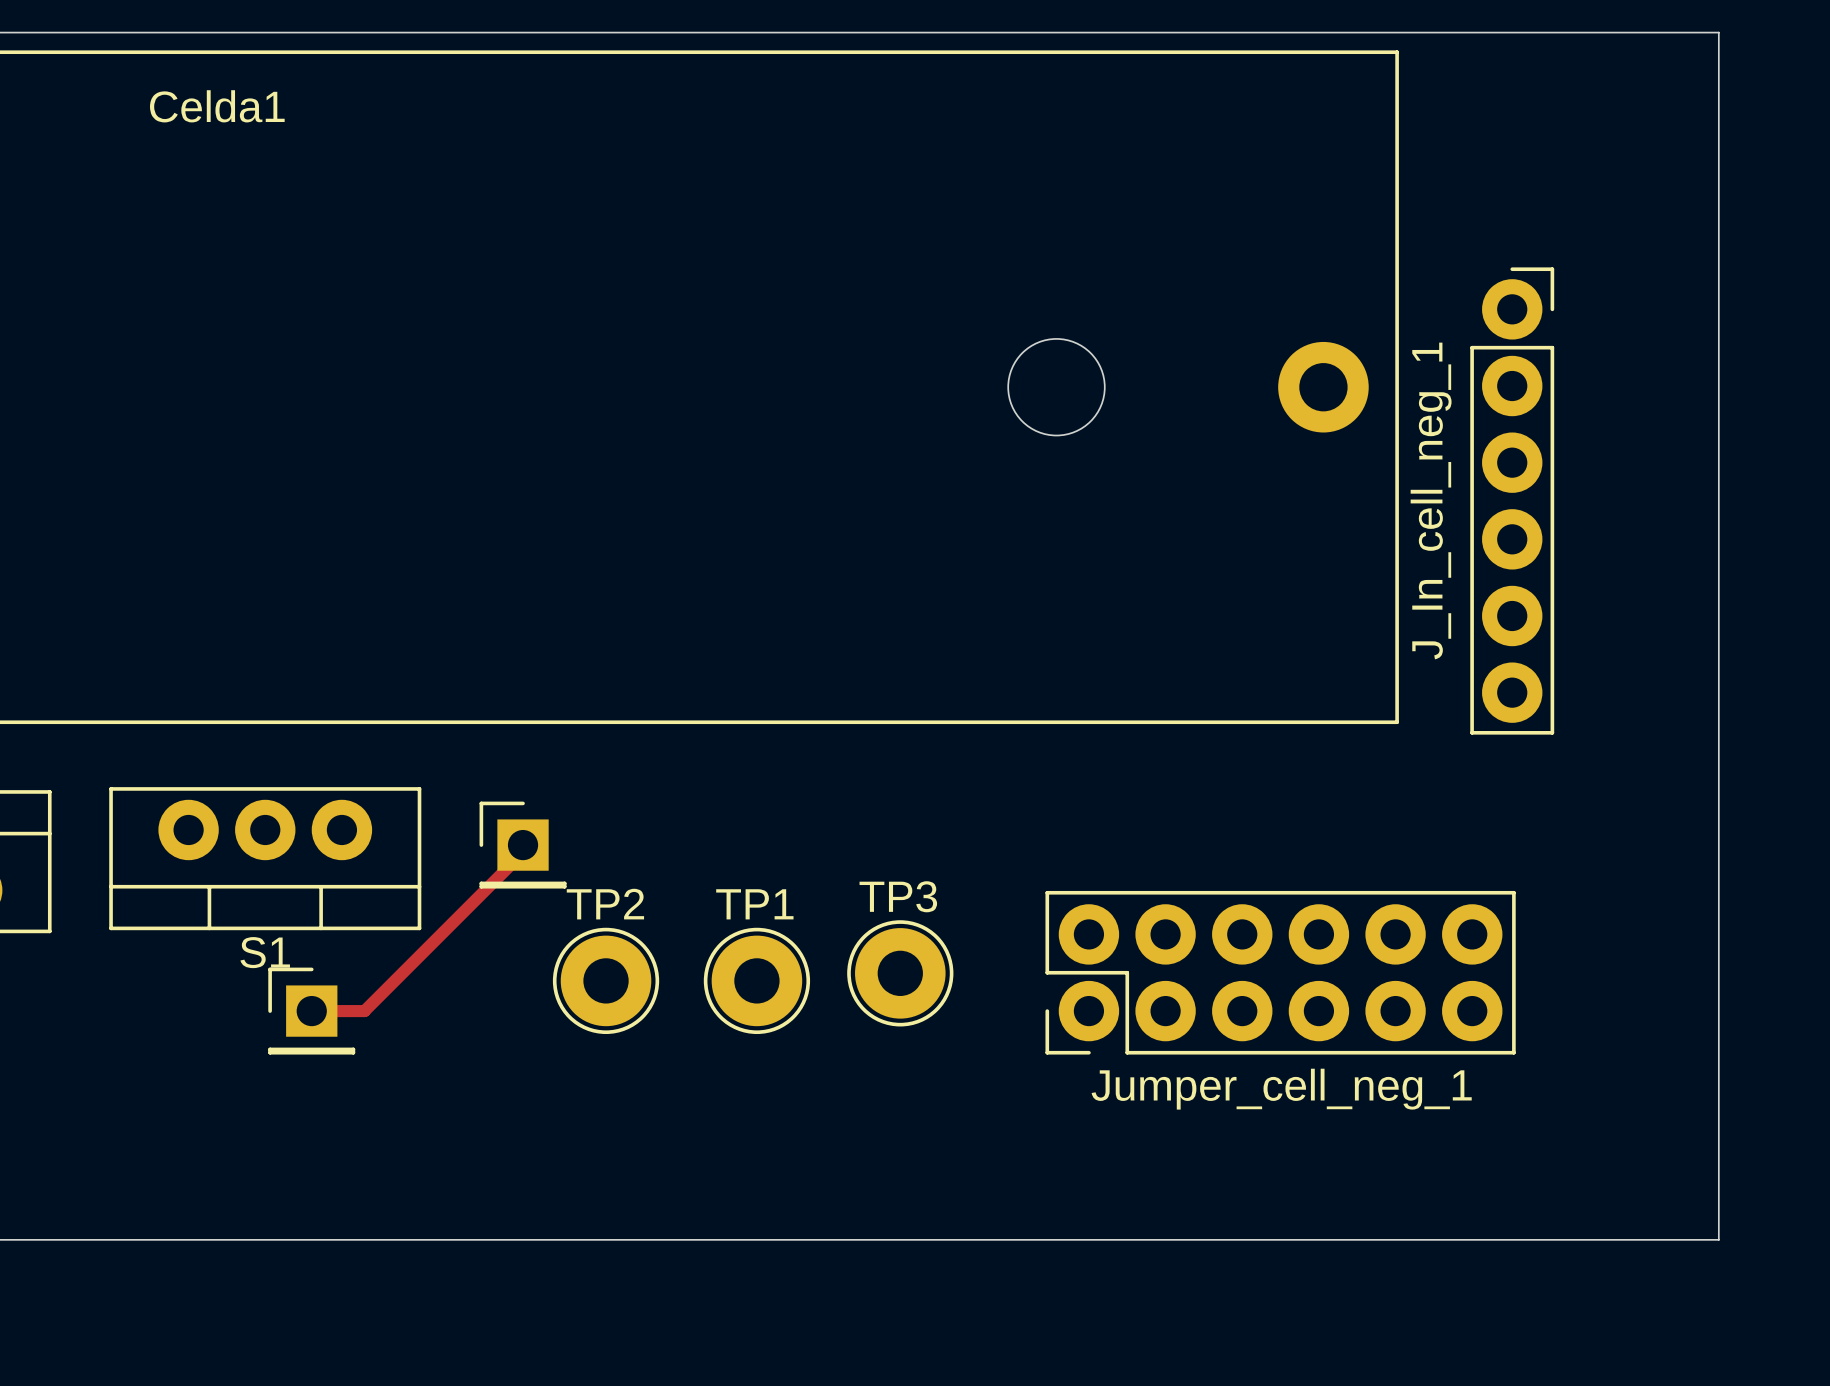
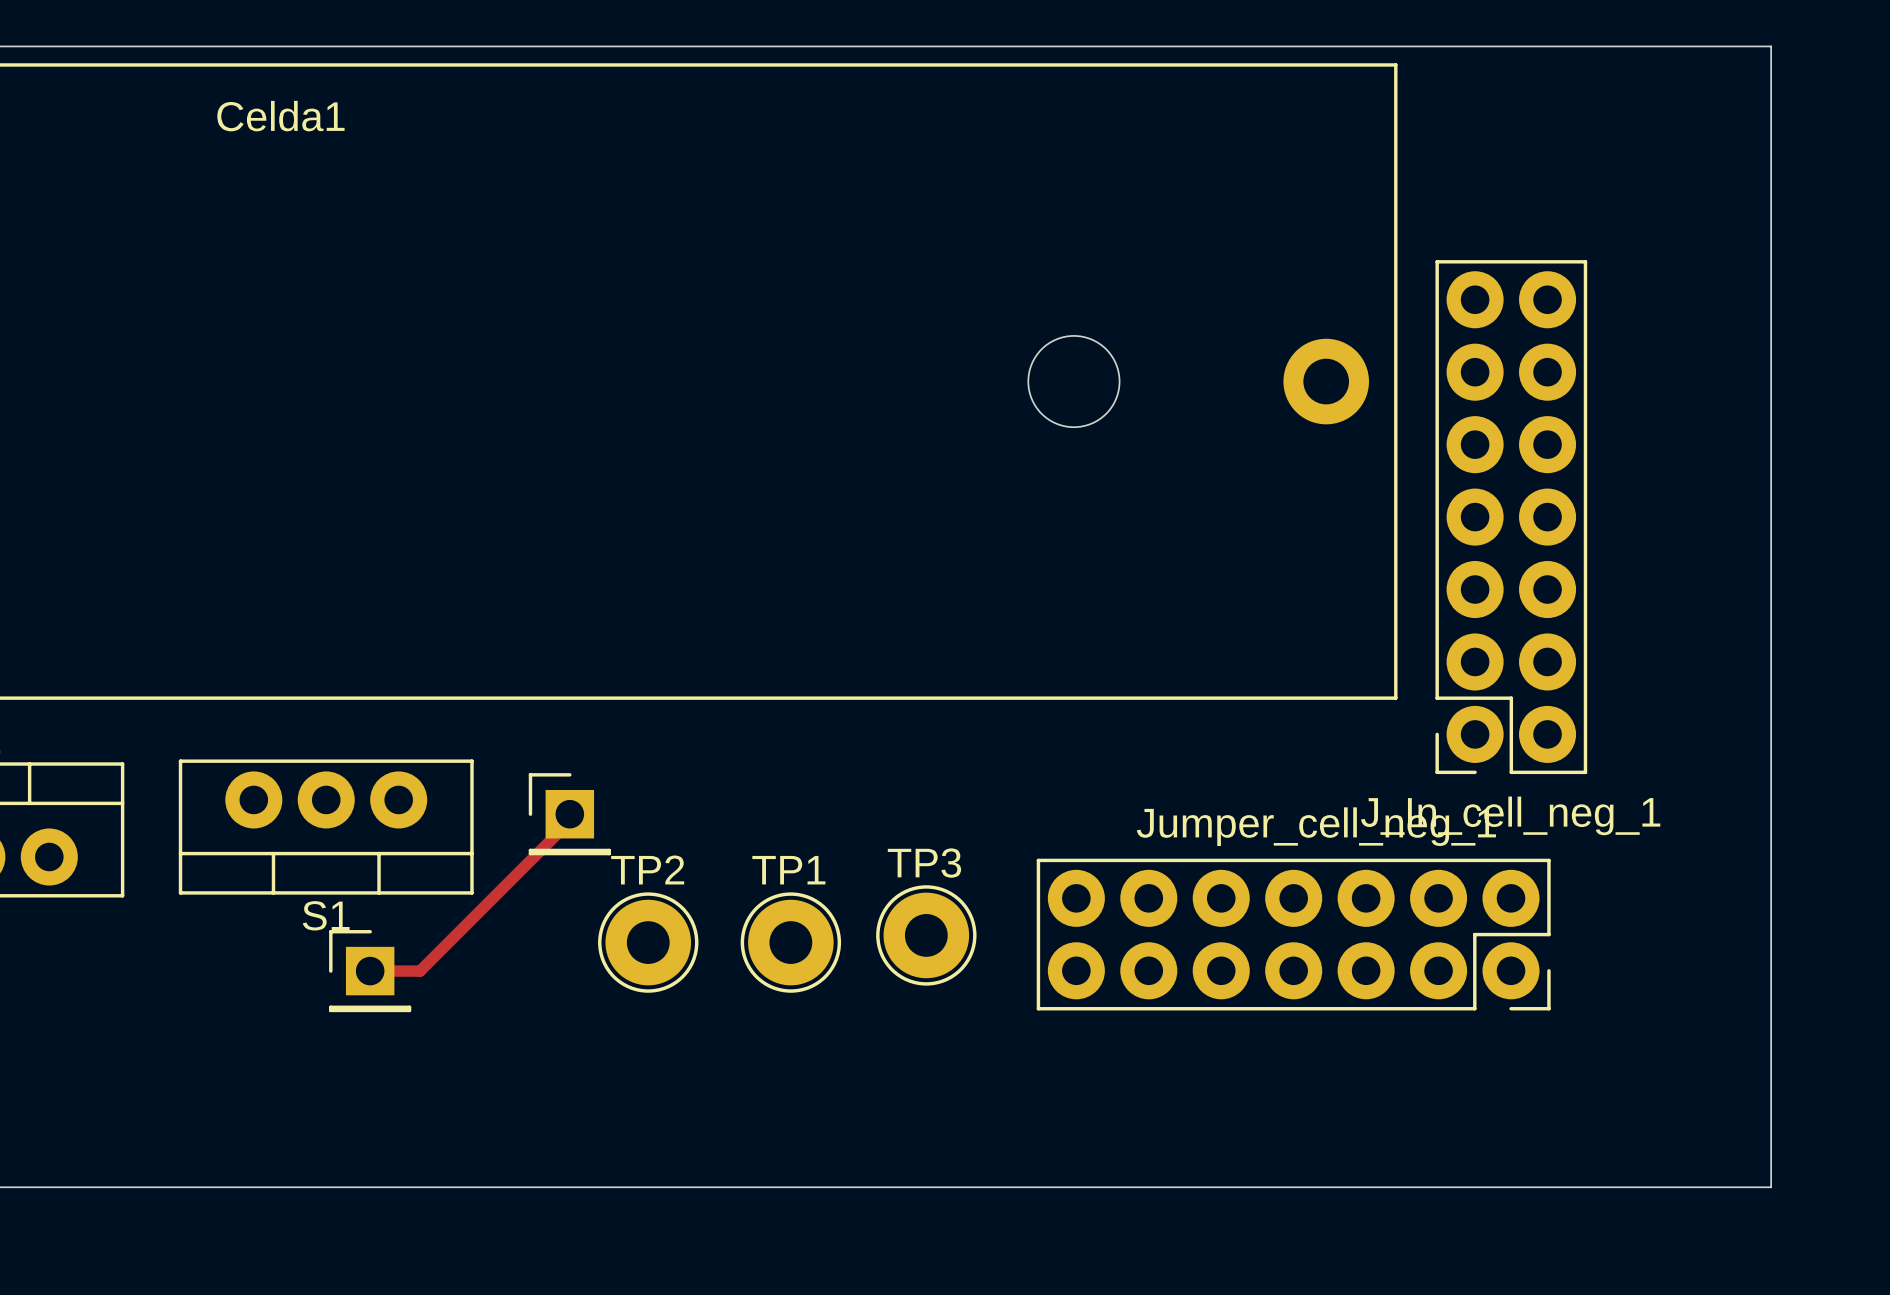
board edge: (1718, 32) (1718, 1239) -> (1699, 46) (1771, 46) (1771, 1187) (1699, 1187)
J_In_cell_neg_1 footprint: [1470, 267, 1555, 735] -> [1435, 260, 1588, 775]
J_In_cell_neg_1 name position: J_In_cell_neg_1 (1431, 500) -> J_In_cell_neg_1 (1510, 815)
Jumper_cell_neg_1 footprint: [1045, 890, 1516, 1055] -> [1036, 858, 1551, 1011]
Jumper_cell_neg_1 name position: Jumper_cell_neg_1 (1281, 1089) -> Jumper_cell_neg_1 (1316, 826)

